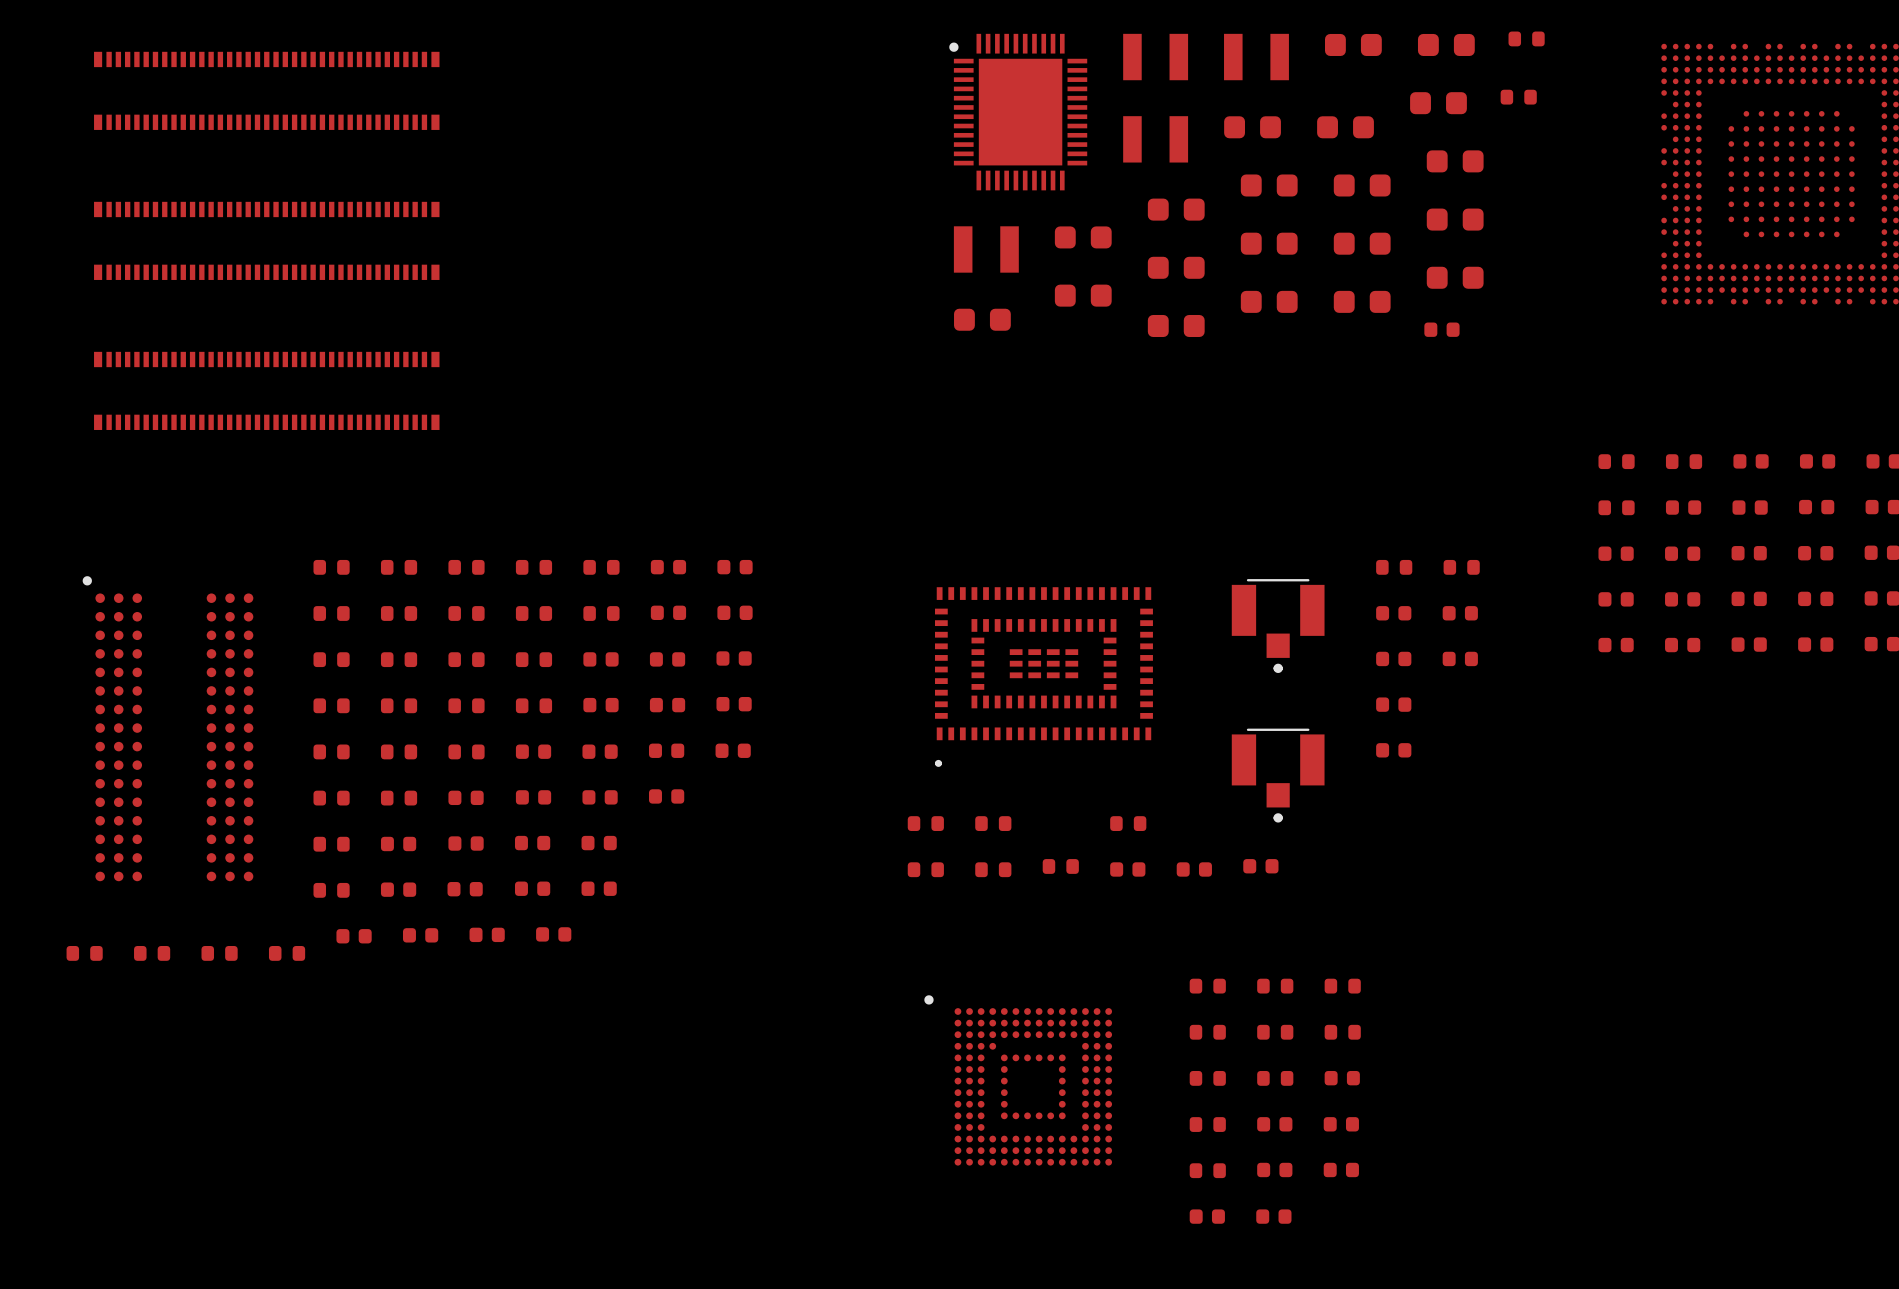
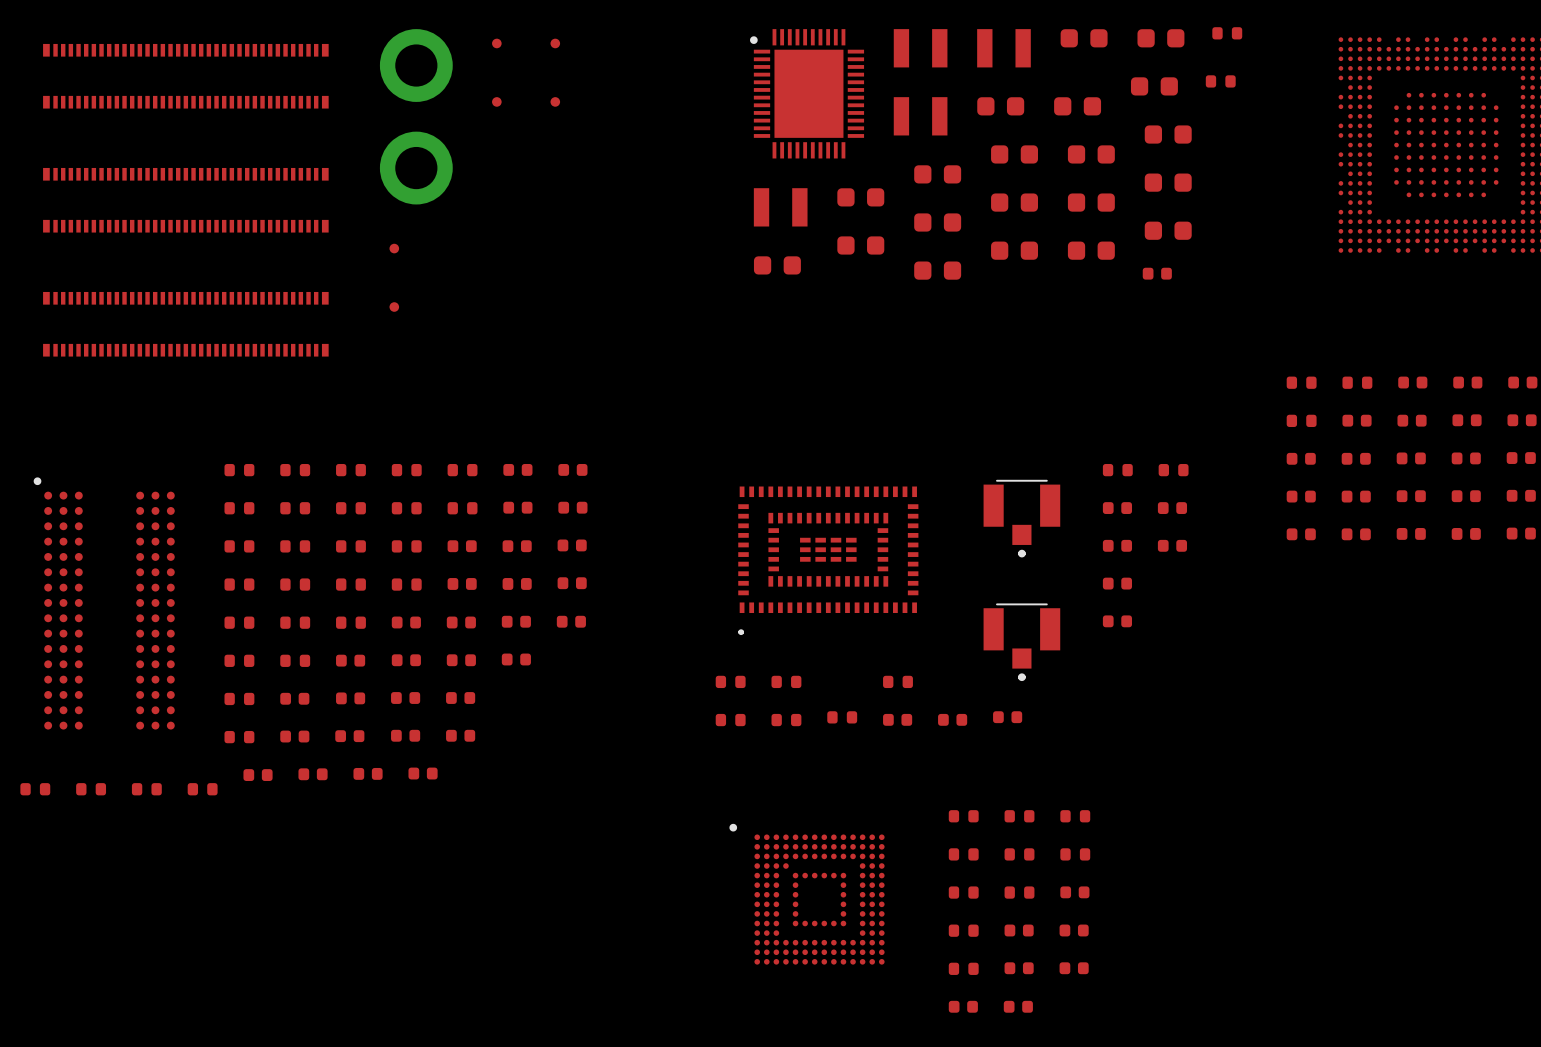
part: none -> (496, 43)
part: none -> (555, 43)
part: none -> (416, 65)
part: none -> (496, 101)
part: none -> (555, 101)
part: none -> (416, 168)
part: none -> (394, 248)
part: none -> (394, 307)

